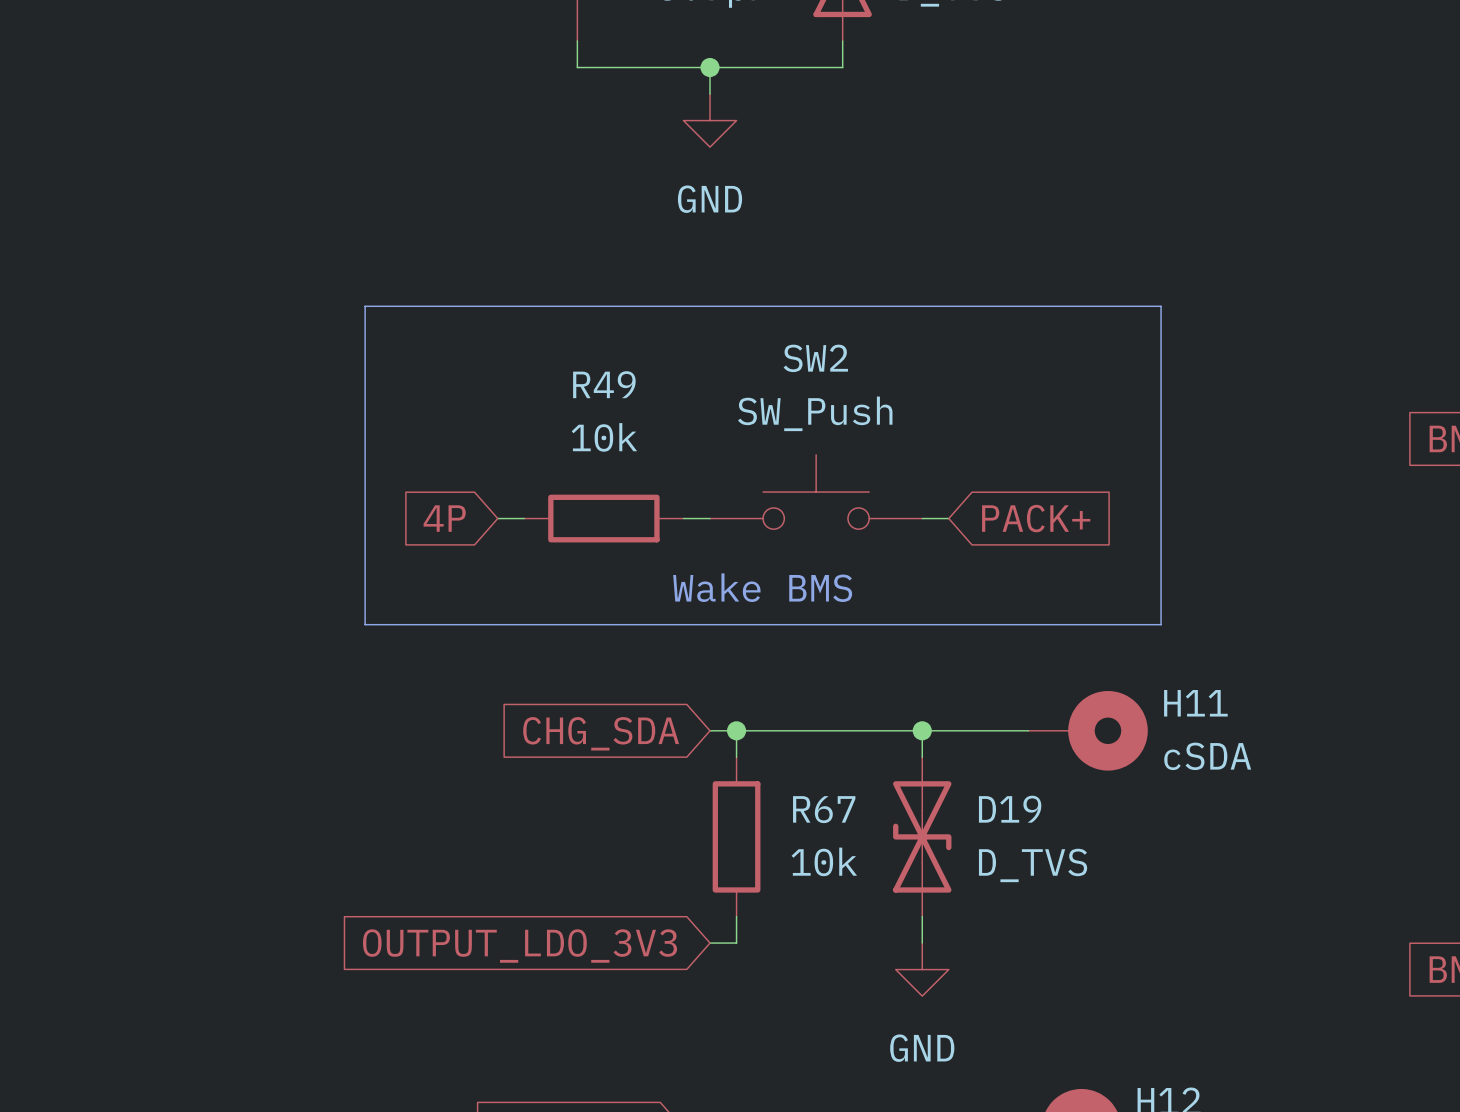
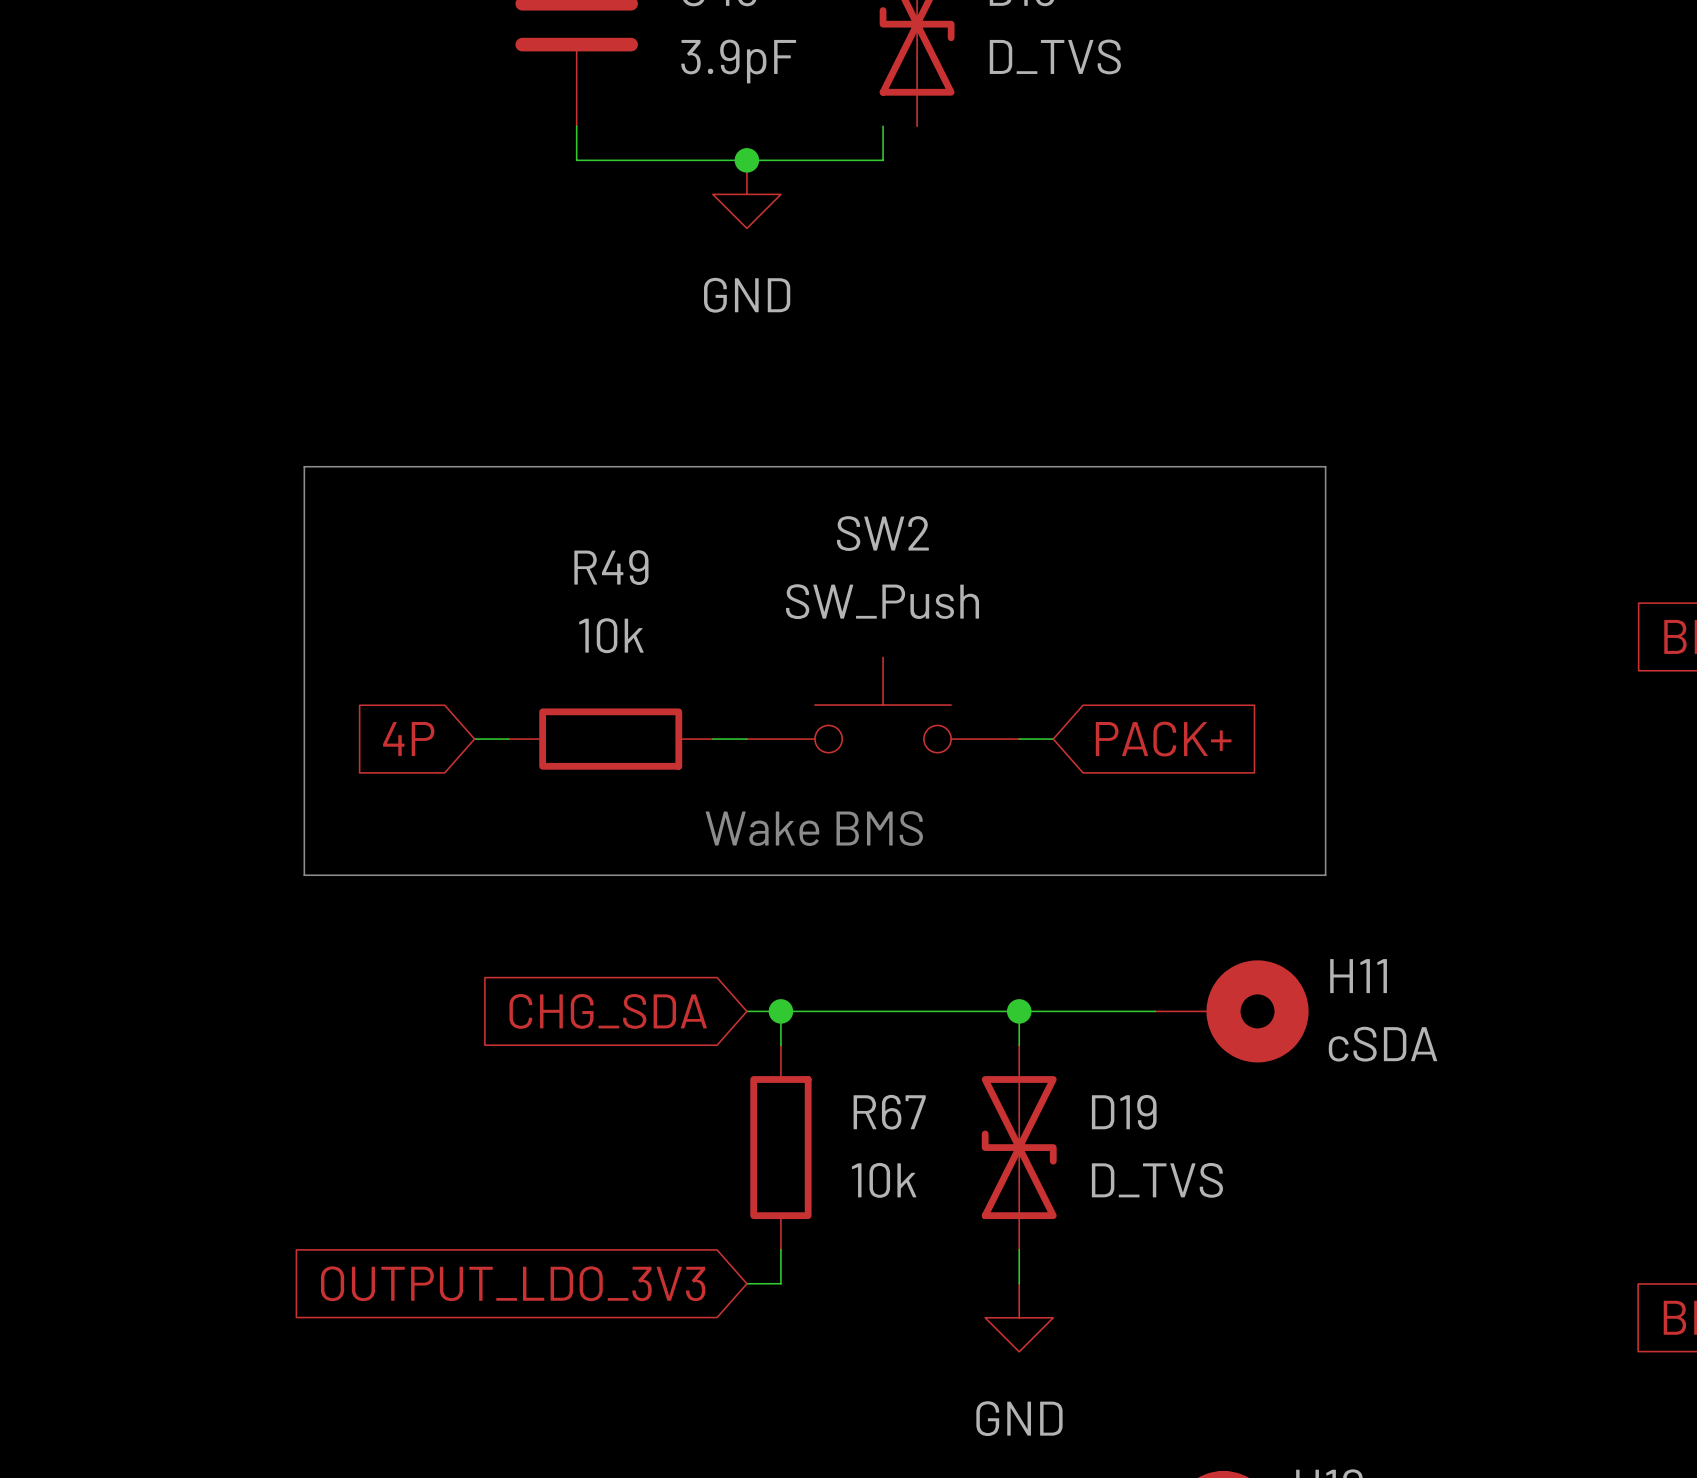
wire: (842, 40) (842, 67) (816, 67) -> (883, 126) (883, 160)
power symbol position: GND (710, 120) -> GND (746, 194)

